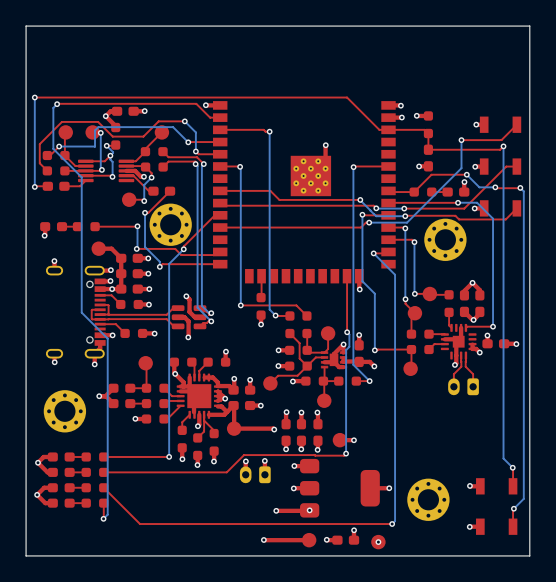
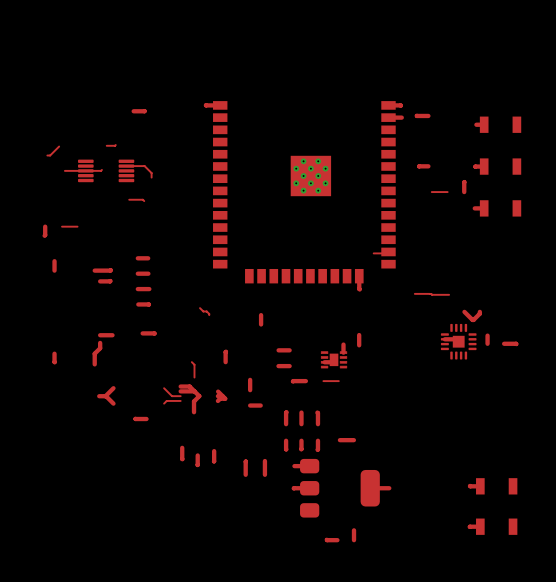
board edge: (529, 26) (26, 26) (26, 555) (529, 555) (529, 26) -> none
top track: (34, 97) (347, 97) (379, 129) (424, 129) (428, 133) (428, 149) (500, 149) (503, 146) -> none
bottom track: (34, 97) (34, 186) -> none
via: (34, 97) -> none
top track: (57, 104) (196, 103) (210, 117) (220, 117) -> none
bottom track: (57, 104) (53, 107) (53, 148) (81, 177) (81, 312) (107, 338) (107, 514) (103, 518) -> none
via: (57, 104) -> none
via: (205, 105) -> none
via: (400, 105) -> none
top track: (117, 111) (110, 111) (105, 116) (115, 127) -> none
part: (125, 111) -> none
via: (144, 111) -> none
via: (416, 115) -> none
via: (105, 116) -> none
via: (401, 117) -> none
top track: (184, 121) (158, 121) (143, 136) (112, 136) (98, 121) (61, 121) (39, 144) (39, 163) (47, 170) -> none
bottom track: (184, 121) (195, 132) (195, 151) -> none
via: (184, 121) -> none
part: (428, 124) -> none
via: (476, 124) -> none
top track: (516, 124) (501, 140) (461, 140) -> none
top track: (220, 129) (263, 129) (269, 131) -> none
bottom track: (269, 131) (269, 309) (275, 315) -> none
via: (269, 131) -> none
top track: (65, 132) (64, 155) (75, 166) (85, 166) -> none
part: (65, 132) -> none
part: (92, 132) -> none
bottom track: (100, 132) (101, 169) -> none
via: (100, 132) -> none
top track: (161, 132) (135, 161) (126, 161) -> none
part: (161, 132) -> none
part: (115, 136) -> none
bottom track: (461, 140) (461, 168) (407, 222) (369, 222) -> none
via: (461, 140) -> none
bottom track: (188, 142) (173, 127) (98, 127) (95, 130) (95, 146) -> none
via: (188, 142) -> none
top track: (220, 142) (188, 142) -> none
bottom track: (106, 145) (113, 152) (110, 155) (112, 161) (112, 176) -> none
via: (106, 145) -> none
top track: (325, 145) (325, 161) -> none
via: (325, 145) -> none
via: (59, 146) -> none
bottom track: (94, 146) (59, 146) -> none
bottom track: (503, 146) (503, 458) (512, 467) -> none
via: (503, 146) -> none
part: (154, 151) -> none
top track: (163, 151) (168, 157) (197, 157) (203, 164) -> none
top track: (195, 151) (198, 154) (220, 154) -> none
via: (195, 151) -> none
part: (56, 155) -> none
top track: (110, 155) (104, 161) (85, 161) -> none
via: (110, 155) -> none
part: (428, 158) -> none
top track: (195, 164) (195, 161) (168, 161) (163, 167) -> none
bottom track: (195, 164) (197, 165) (197, 307) (211, 321) -> none
via: (195, 164) -> none
bottom track: (203, 164) (201, 165) (201, 305) (211, 313) -> none
via: (203, 164) -> none
top track: (220, 166) (240, 166) -> none
bottom track: (240, 166) (240, 305) -> none
via: (240, 166) -> none
top track: (388, 166) (353, 167) -> none
via: (419, 166) -> none
via: (475, 166) -> none
top track: (516, 166) (506, 166) (464, 208) (404, 208) -> none
part: (154, 167) -> none
bottom track: (353, 167) (353, 364) (369, 381) -> none
via: (353, 167) -> none
via: (101, 169) -> none
part: (56, 170) -> none
top track: (126, 170) (135, 170) (140, 176) (143, 176) -> none
top track: (466, 174) (431, 174) (414, 192) (388, 190) -> none
bottom track: (466, 174) (479, 187) (495, 187) -> none
via: (466, 174) -> none
top track: (85, 175) (112, 176) -> none
top track: (126, 175) (133, 175) (148, 191) (153, 191) -> none
via: (112, 176) -> none
via: (143, 176) -> none
bottom track: (151, 177) (144, 184) (144, 201) -> none
via: (151, 177) -> none
top track: (85, 180) (80, 186) (64, 186) -> none
via: (464, 182) -> none
via: (34, 186) -> none
top track: (47, 186) (34, 186) -> none
part: (56, 186) -> none
top track: (495, 187) (520, 187) -> none
via: (495, 187) -> none
bottom track: (520, 187) (523, 191) (523, 498) (513, 508) -> none
via: (520, 187) -> none
top track: (220, 190) (270, 190) (279, 199) (360, 199) -> none
part: (161, 191) -> none
top track: (170, 191) (148, 212) (145, 212) -> none
part: (423, 192) -> none
part: (455, 192) -> none
part: (129, 199) -> none
bottom track: (360, 199) (370, 210) -> none
via: (360, 199) -> none
via: (144, 201) -> none
top track: (458, 202) (388, 203) -> none
bottom track: (458, 202) (477, 202) (493, 218) (493, 326) -> none
via: (458, 202) -> none
top track: (220, 203) (222, 205) (373, 205) (376, 208) -> none
bottom track: (376, 208) (404, 208) -> none
via: (376, 208) -> none
via: (404, 208) -> none
via: (474, 208) -> none
top track: (516, 208) (505, 219) (459, 219) (455, 215) (405, 216) -> none
bottom track: (370, 210) (373, 214) -> none
bottom track: (145, 212) (145, 246) (159, 261) (159, 266) -> none
via: (145, 212) -> none
top track: (362, 214) (388, 215) -> none
bottom track: (362, 214) (362, 281) (374, 293) (374, 350) -> none
via: (362, 214) -> none
bottom track: (374, 214) (376, 216) (405, 216) -> none
top track: (220, 215) (214, 215) (183, 246) (183, 249) -> none
via: (405, 216) -> none
top track: (369, 222) (365, 222) (361, 227) (220, 227) -> none
via: (369, 222) -> none
part: (170, 224) -> none
part: (53, 226) -> none
part: (86, 226) -> none
top track: (137, 226) (95, 226) -> none
bottom track: (137, 226) (136, 248) -> none
via: (137, 226) -> none
top track: (388, 227) (405, 228) -> none
bottom track: (405, 228) (405, 299) -> none
via: (405, 228) -> none
via: (44, 235) -> none
top track: (388, 239) (412, 239) (414, 242) -> none
part: (445, 239) -> none
bottom track: (414, 242) (414, 293) -> none
via: (414, 242) -> none
top track: (98, 248) (111, 248) (121, 258) (121, 289) (100, 289) -> none
part: (98, 248) -> none
top track: (136, 248) (175, 248) (181, 255) (217, 255) (220, 251) -> none
via: (136, 248) -> none
bottom track: (183, 249) (169, 263) (169, 456) -> none
via: (183, 249) -> none
bottom track: (373, 253) (395, 274) (395, 521) (392, 524) -> none
via: (373, 253) -> none
part: (129, 258) -> none
via: (148, 258) -> none
via: (54, 261) -> none
top track: (220, 264) (162, 264) (159, 266) -> none
via: (159, 266) -> none
via: (110, 270) -> none
part: (129, 273) -> none
via: (148, 273) -> none
top track: (261, 276) (261, 297) -> none
top track: (347, 276) (347, 332) -> none
via: (110, 281) -> none
via: (472, 282) -> none
via: (112, 289) -> none
part: (129, 289) -> none
via: (149, 289) -> none
via: (359, 289) -> none
via: (414, 293) -> none
part: (429, 293) -> none
top track: (100, 295) (111, 295) (120, 304) -> none
top track: (479, 295) (479, 290) (472, 282) (464, 290) (464, 295) -> none
top track: (186, 296) (189, 299) (189, 311) (194, 317) (200, 317) -> none
via: (186, 296) -> none
top track: (405, 299) (405, 303) (414, 313) (411, 316) (411, 334) -> none
via: (405, 299) -> none
part: (449, 303) -> none
part: (464, 303) -> none
part: (479, 303) -> none
top track: (100, 304) (108, 305) (108, 314) -> none
part: (129, 304) -> none
via: (148, 304) -> none
top track: (240, 305) (296, 305) (306, 315) -> none
via: (240, 305) -> none
part: (261, 306) -> none
top track: (178, 308) (173, 308) (166, 314) (100, 314) -> none
top track: (100, 309) (91, 310) (92, 319) (166, 319) (173, 326) (178, 326) -> none
part: (75, 312) -> none
top track: (449, 312) (449, 325) (451, 327) -> none
via: (211, 313) -> none
part: (414, 313) -> none
top track: (275, 315) (289, 315) -> none
via: (275, 315) -> none
top track: (178, 317) (184, 317) (188, 321) (188, 337) -> none
part: (189, 317) -> none
top track: (209, 319) (200, 326) -> none
via: (473, 319) -> none
via: (211, 321) -> none
top track: (100, 324) (115, 324) (125, 333) -> none
via: (261, 324) -> none
part: (289, 324) -> none
part: (306, 324) -> none
top track: (493, 326) (465, 327) -> none
via: (493, 326) -> none
top track: (461, 327) (461, 339) (456, 344) (454, 364) -> none
bottom track: (347, 332) (349, 334) (349, 346) (346, 350) (346, 453) -> none
via: (347, 332) -> none
part: (133, 333) -> none
via: (154, 333) -> none
top track: (289, 333) (299, 343) (299, 358) (307, 366) -> none
top track: (328, 333) (328, 349) (324, 352) (309, 352) (307, 350) (306, 333) -> none
part: (328, 333) -> none
part: (420, 334) -> none
top track: (429, 334) (444, 334) -> none
via: (112, 335) -> none
via: (359, 335) -> none
via: (487, 335) -> none
via: (188, 337) -> none
part: (495, 343) -> none
top track: (343, 344) (334, 354) (334, 362) (339, 367) (343, 367) -> none
via: (343, 344) -> none
top track: (444, 344) (434, 344) (429, 349) -> none
top track: (472, 344) (472, 348) (476, 348) (479, 352) -> none
via: (516, 344) -> none
part: (420, 349) -> none
via: (278, 350) -> none
part: (298, 350) -> none
top track: (374, 350) (411, 349) (410, 368) -> none
via: (374, 350) -> none
via: (225, 351) -> none
via: (479, 352) -> none
part: (359, 353) -> none
top track: (461, 355) (461, 366) (453, 374) (453, 386) -> none
top track: (465, 355) (465, 366) (473, 374) (473, 386) -> none
top track: (324, 357) (315, 357) (297, 375) (278, 375) (270, 383) -> none
top track: (343, 358) (343, 361) (369, 361) (374, 366) -> none
via: (54, 362) -> none
top track: (174, 362) (174, 372) (183, 382) (183, 386) -> none
part: (183, 362) -> none
top track: (208, 362) (199, 370) (199, 377) -> none
part: (216, 362) -> none
top track: (145, 363) (146, 388) (130, 388) -> none
part: (145, 363) -> none
via: (94, 364) -> none
via: (454, 364) -> none
via: (278, 366) -> none
part: (298, 366) -> none
via: (374, 366) -> none
top track: (324, 367) (324, 400) -> none
part: (410, 368) -> none
via: (175, 373) -> none
top track: (189, 377) (189, 386) -> none
top track: (204, 377) (212, 377) (217, 382) (217, 386) (229, 386) (233, 390) (234, 378) -> none
via: (234, 378) -> none
via: (250, 379) -> none
via: (292, 381) -> none
part: (314, 381) -> none
part: (347, 381) -> none
top track: (369, 381) (356, 381) -> none
via: (369, 381) -> none
part: (270, 383) -> none
part: (463, 386) -> none
part: (121, 388) -> none
part: (155, 388) -> none
part: (241, 390) -> none
via: (99, 396) -> none
part: (199, 396) -> none
via: (225, 398) -> none
part: (324, 400) -> none
part: (121, 403) -> none
top track: (146, 403) (130, 403) -> none
part: (155, 403) -> none
top track: (180, 405) (167, 419) (164, 419) -> none
part: (241, 405) -> none
via: (260, 405) -> none
top track: (217, 406) (221, 406) (227, 412) -> none
part: (64, 411) -> none
via: (286, 412) -> none
via: (301, 412) -> none
via: (317, 412) -> none
top track: (189, 414) (182, 422) (182, 430) -> none
top track: (199, 414) (197, 426) -> none
top track: (204, 414) (204, 431) (197, 437) -> none
top track: (208, 414) (224, 414) (233, 405) (234, 428) (274, 429) -> none
via: (135, 418) -> none
part: (155, 419) -> none
top track: (204, 420) (213, 429) -> none
via: (197, 426) -> none
part: (234, 428) -> none
via: (274, 429) -> none
part: (286, 432) -> none
part: (301, 432) -> none
part: (317, 432) -> none
part: (182, 439) -> none
part: (339, 440) -> none
via: (353, 440) -> none
part: (214, 442) -> none
part: (197, 446) -> none
via: (286, 449) -> none
via: (301, 449) -> none
via: (317, 449) -> none
top track: (346, 453) (344, 455) (244, 455) (226, 472) (103, 472) -> none
via: (346, 453) -> none
top track: (52, 456) (43, 456) (37, 462) (47, 472) (52, 472) -> none
part: (61, 456) -> none
top track: (86, 456) (69, 456) -> none
part: (95, 456) -> none
top track: (169, 456) (103, 456) -> none
via: (169, 456) -> none
via: (182, 459) -> none
via: (264, 460) -> none
via: (213, 461) -> none
via: (245, 461) -> none
via: (37, 462) -> none
via: (197, 465) -> none
via: (294, 466) -> none
top track: (512, 467) (513, 486) -> none
via: (512, 467) -> none
part: (61, 472) -> none
top track: (86, 472) (69, 472) -> none
part: (95, 472) -> none
part: (255, 474) -> none
via: (469, 485) -> none
top track: (52, 487) (44, 487) (37, 494) (45, 503) (52, 503) -> none
part: (61, 487) -> none
top track: (86, 487) (69, 487) -> none
part: (95, 487) -> none
top track: (103, 487) (140, 524) (392, 524) -> none
via: (293, 488) -> none
via: (389, 488) -> none
via: (37, 494) -> none
part: (428, 499) -> none
part: (61, 503) -> none
top track: (86, 503) (69, 503) -> none
part: (95, 503) -> none
top track: (103, 503) (103, 518) -> none
top track: (513, 508) (513, 526) -> none
via: (513, 508) -> none
via: (276, 510) -> none
top track: (309, 510) (276, 510) -> none
via: (309, 510) -> none
via: (103, 518) -> none
via: (392, 524) -> none
via: (469, 526) -> none
via: (354, 530) -> none
top track: (263, 539) (309, 540) -> none
via: (263, 539) -> none
via: (326, 539) -> none
part: (309, 540) -> none
part: (345, 540) -> none
part: (378, 542) -> none
via: (378, 542) -> none

